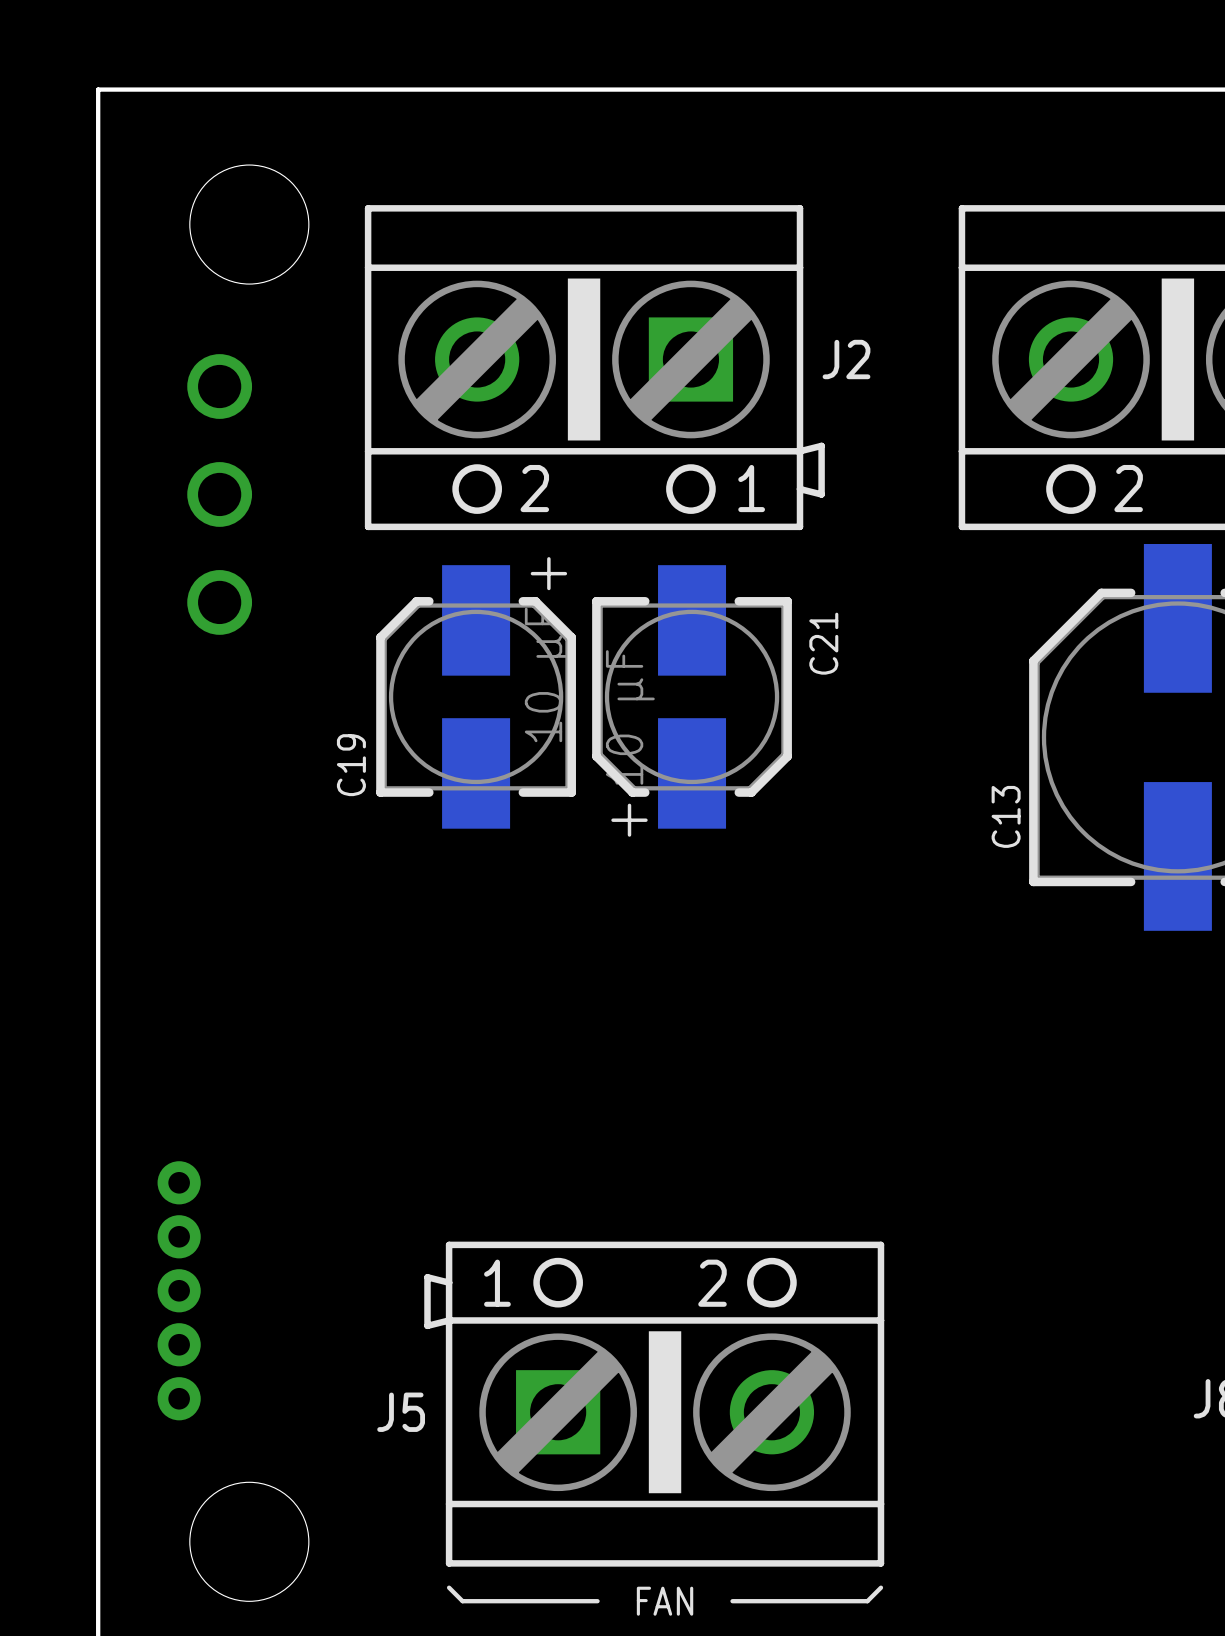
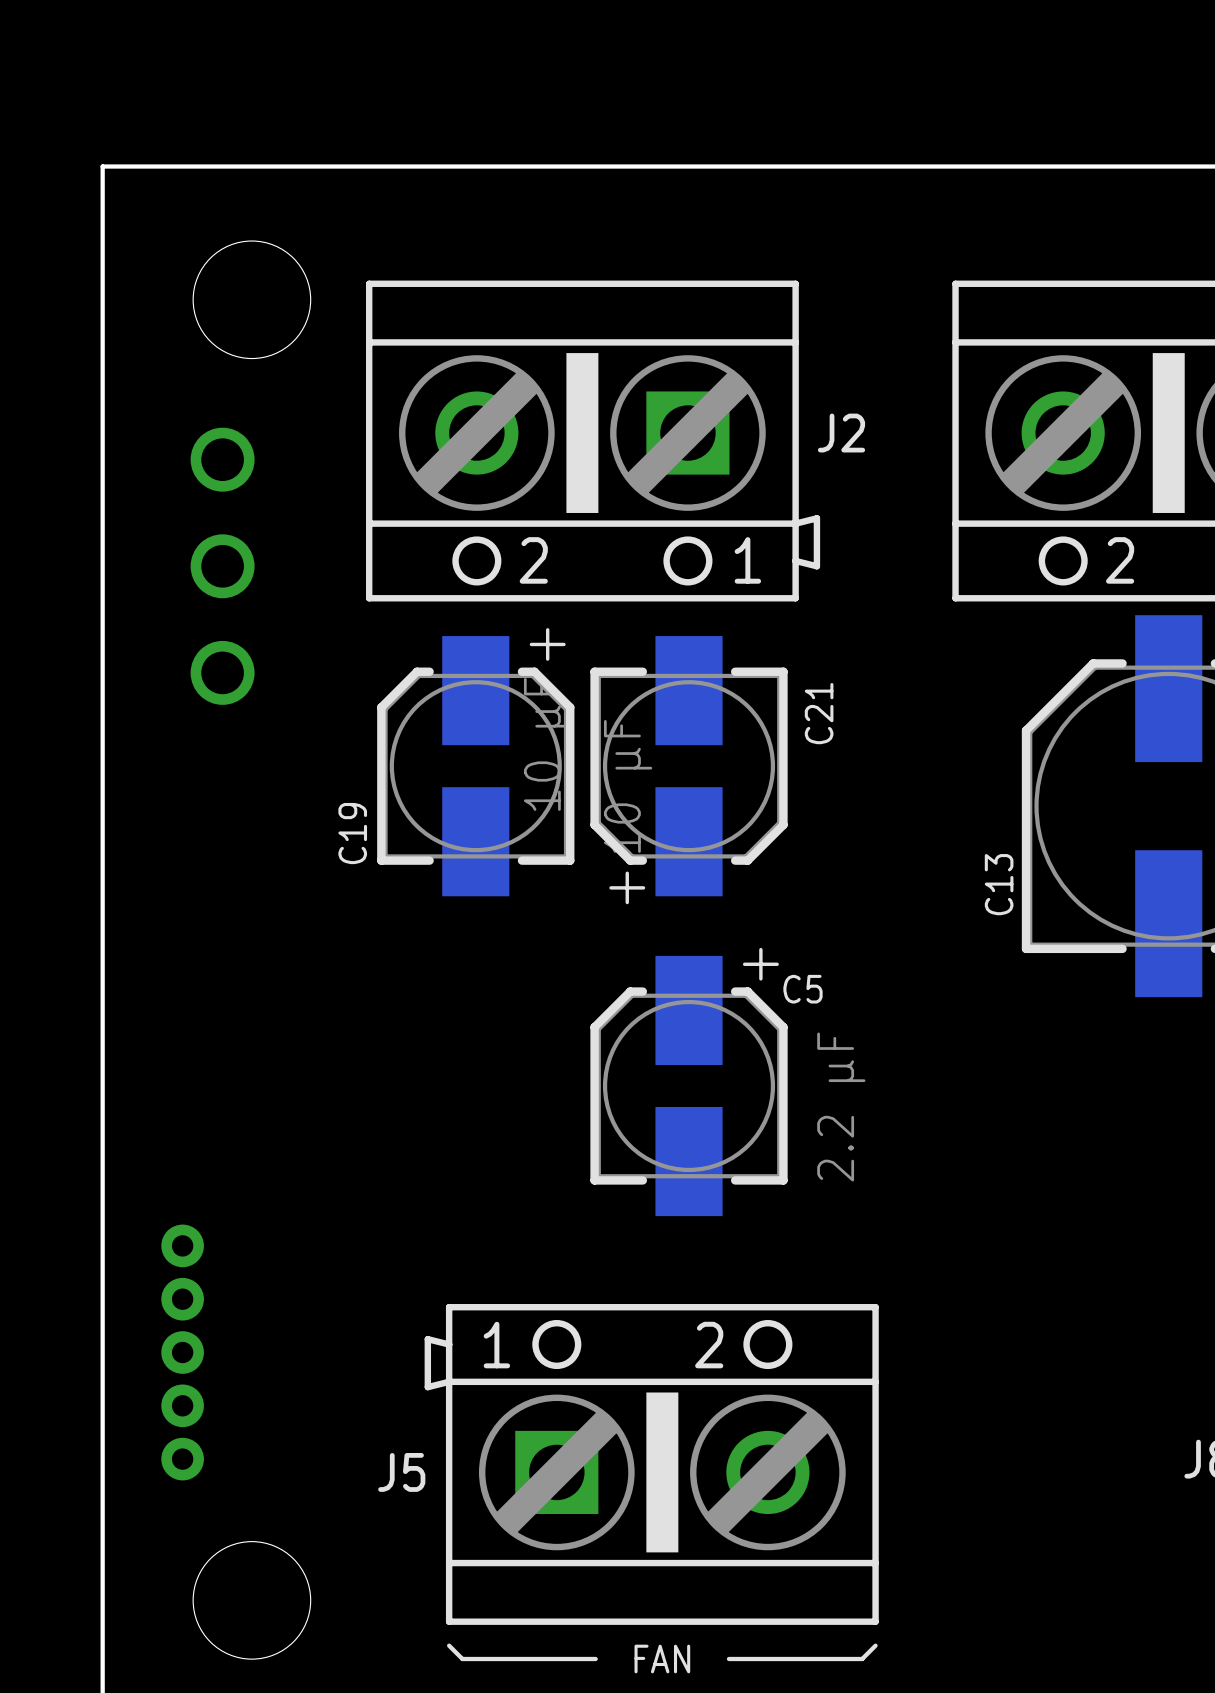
C5: none -> 2.2 µF (689, 1085)

